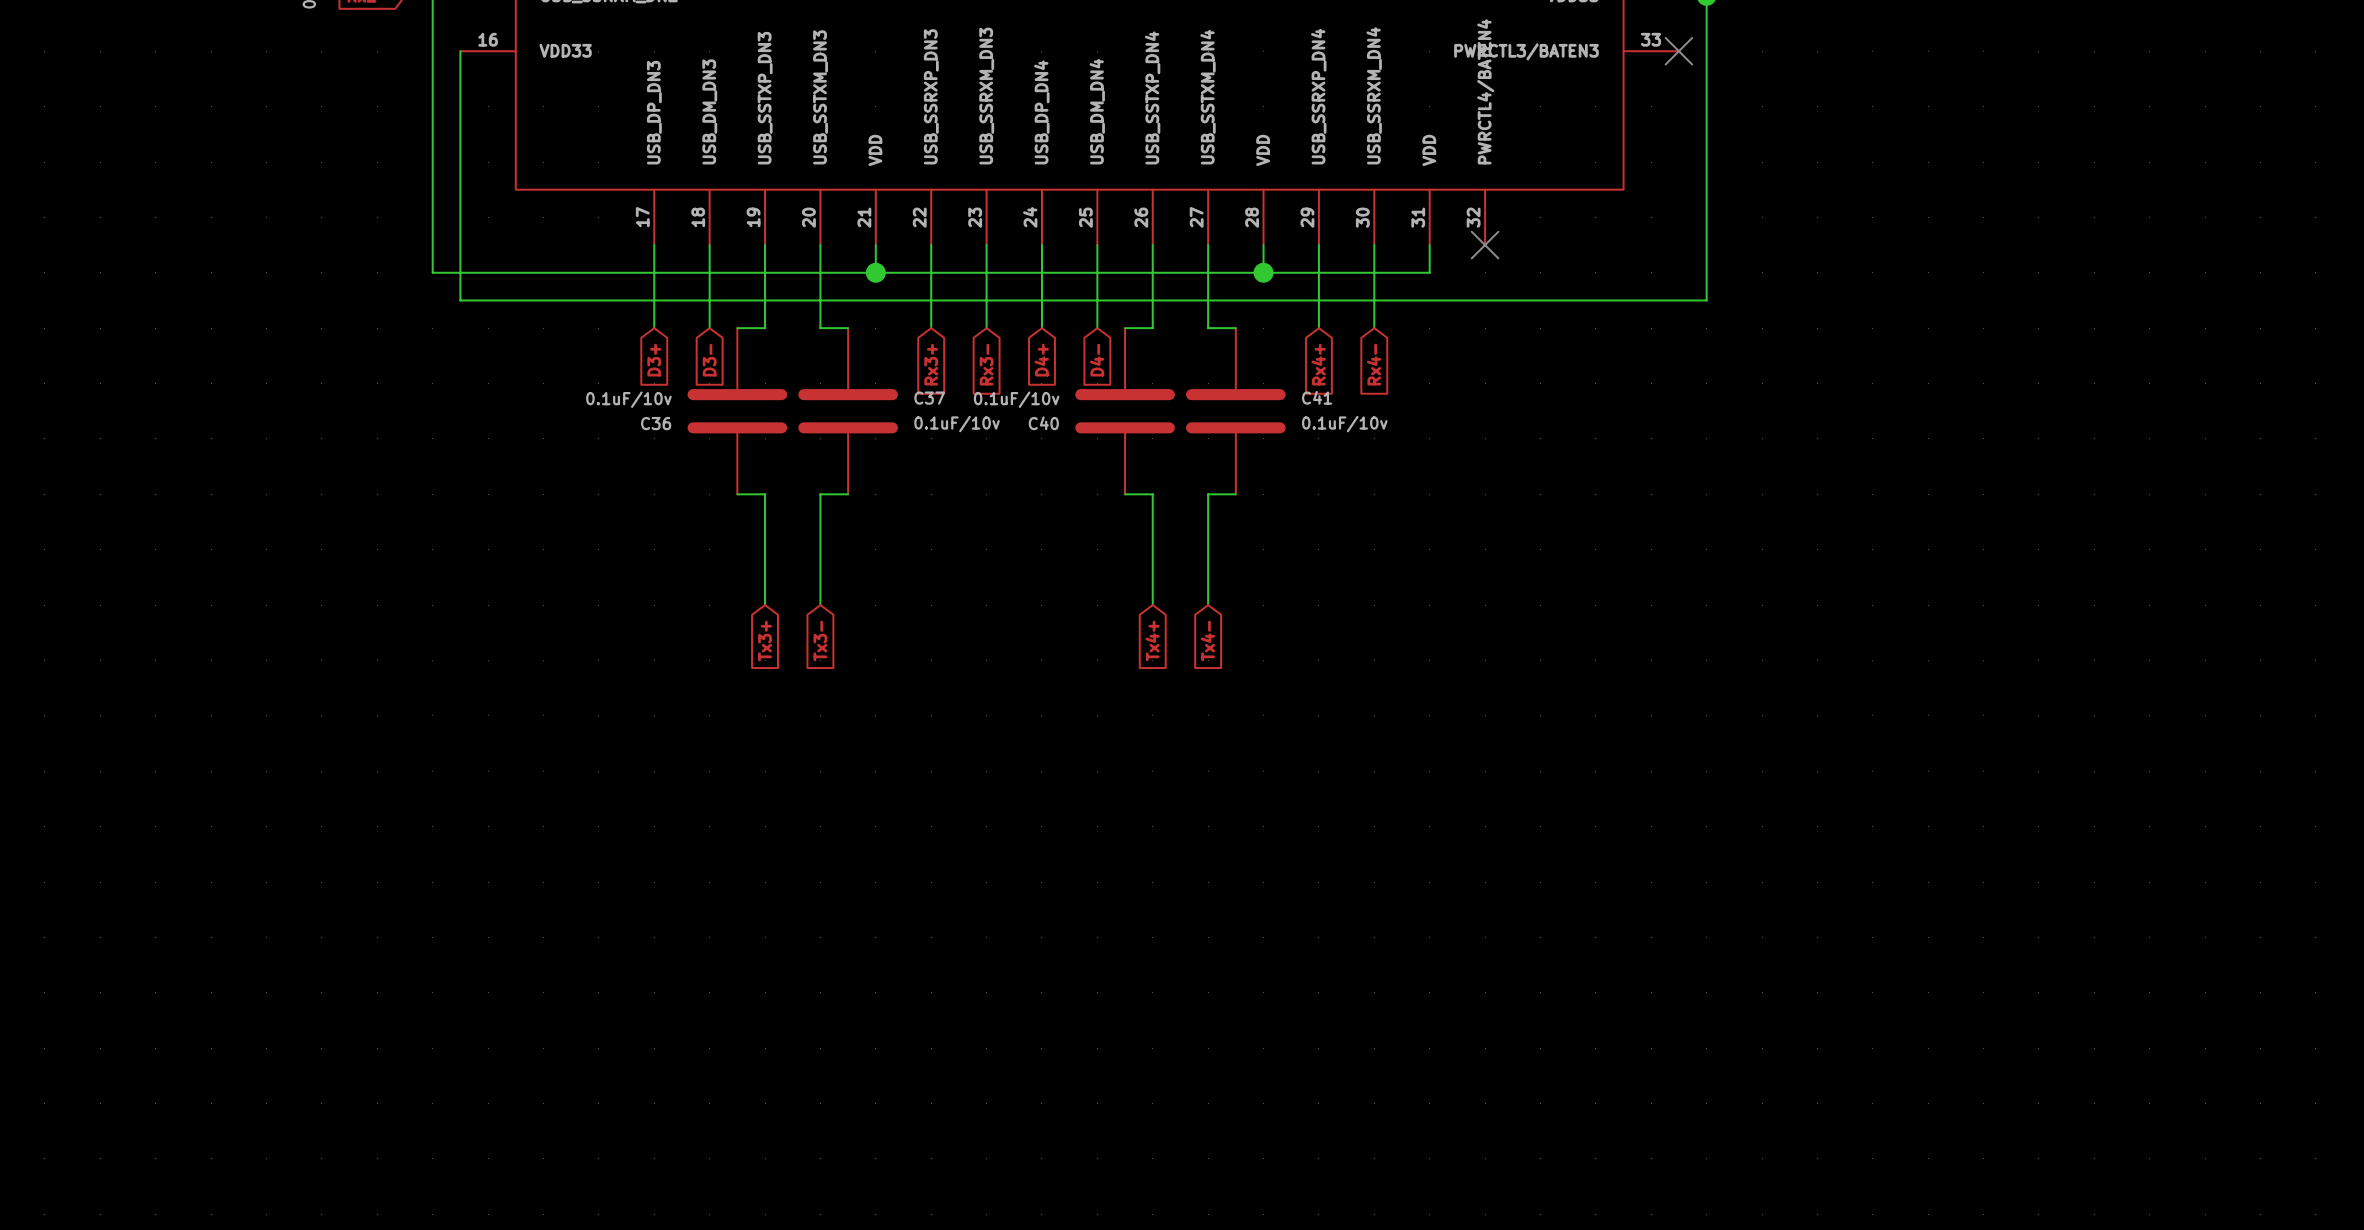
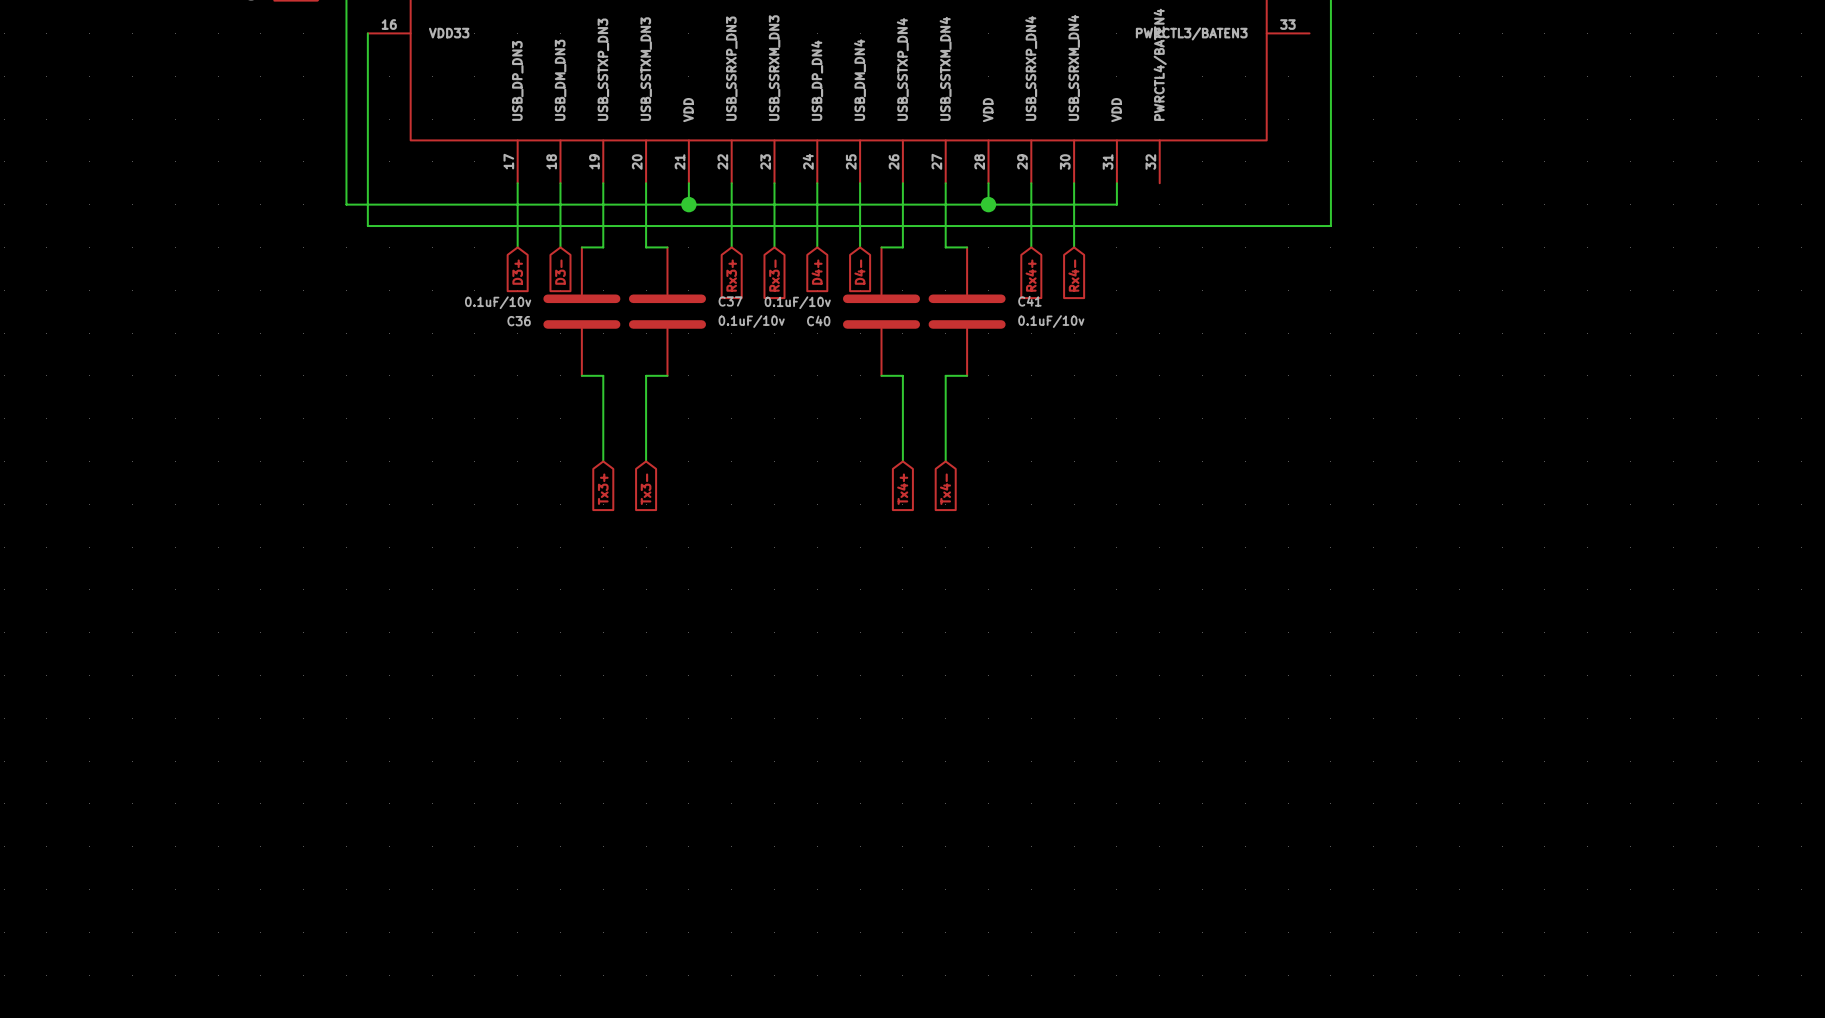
no-connect mark: (1678, 51) -> none
no-connect mark: (1485, 245) -> none

